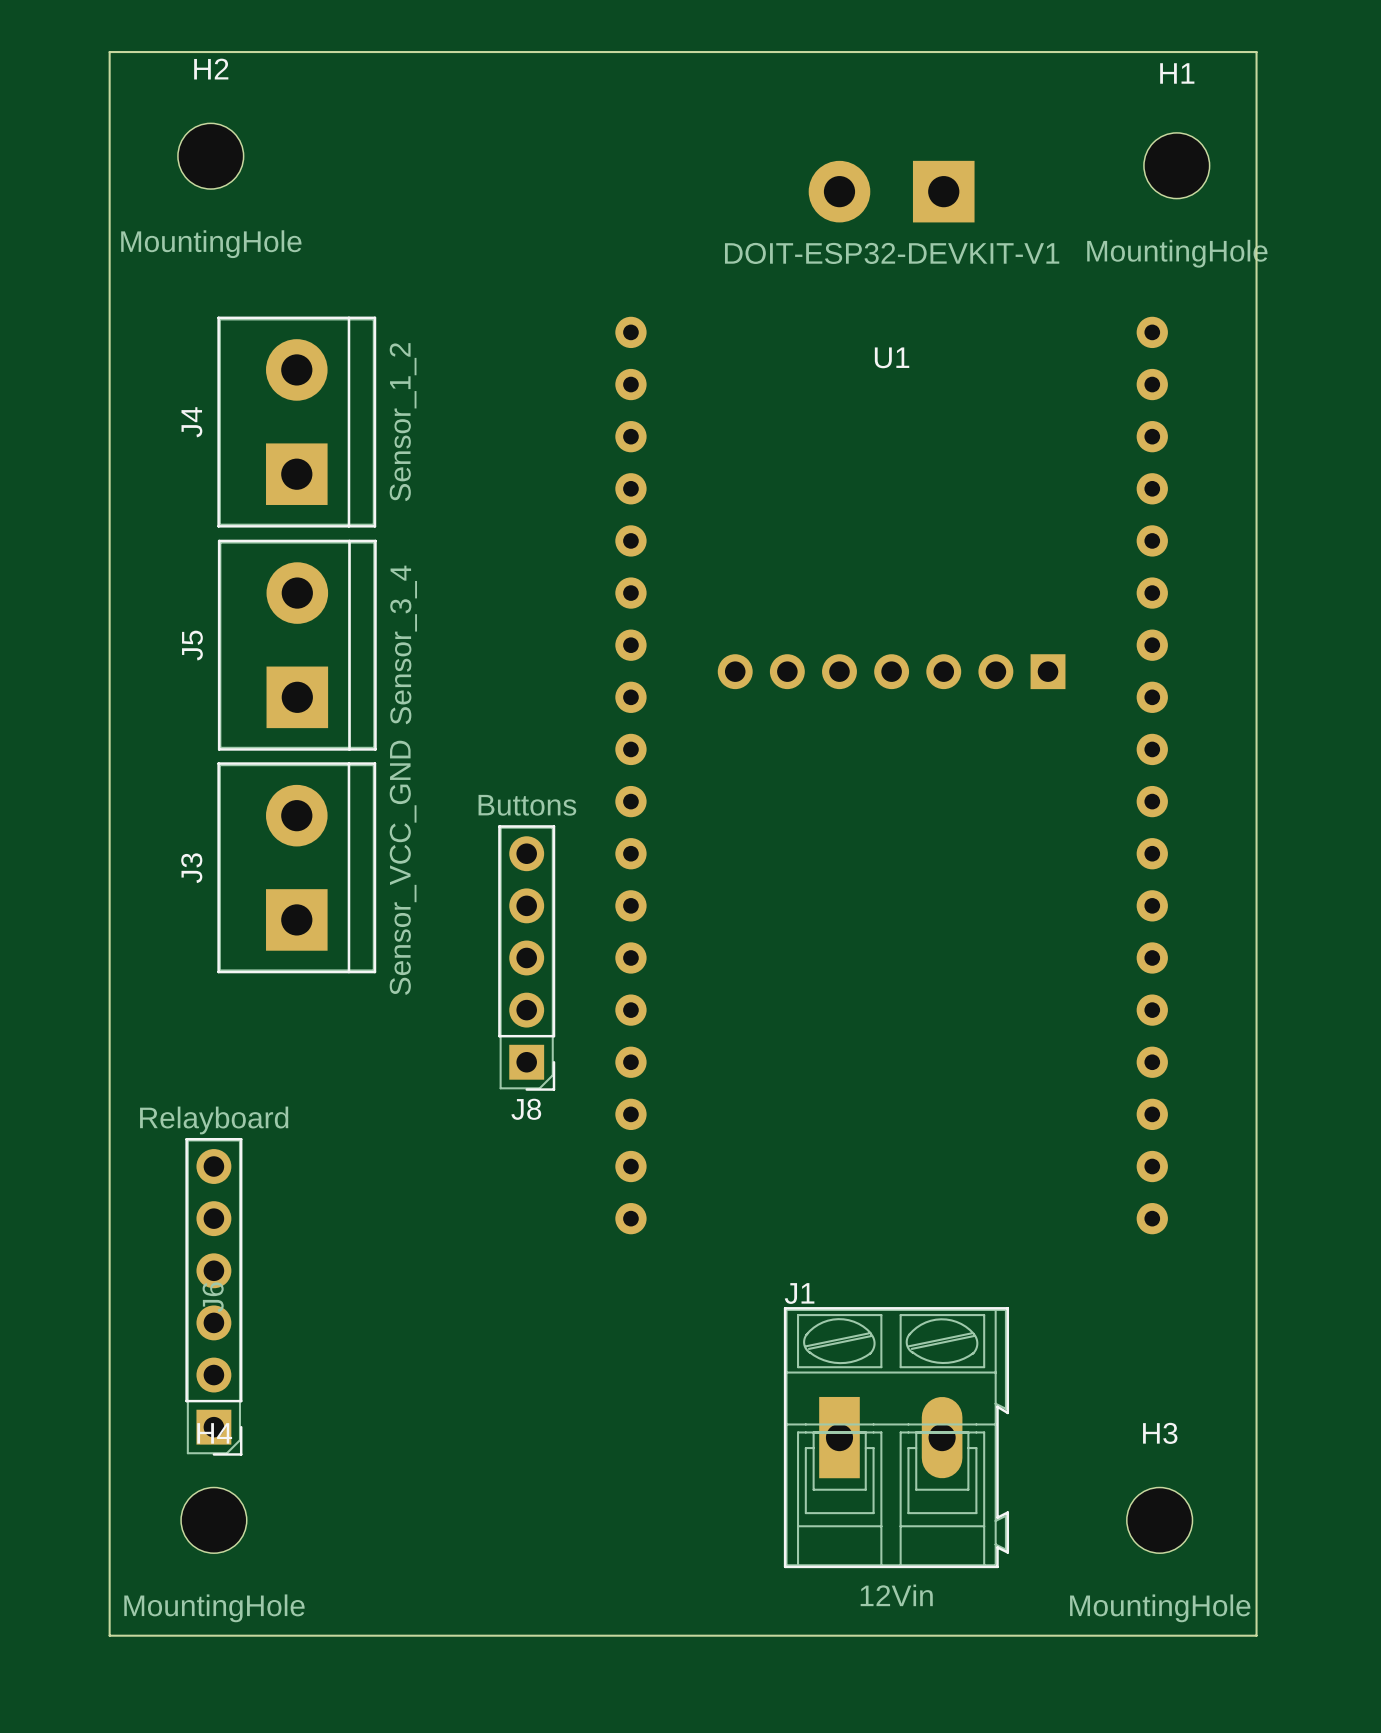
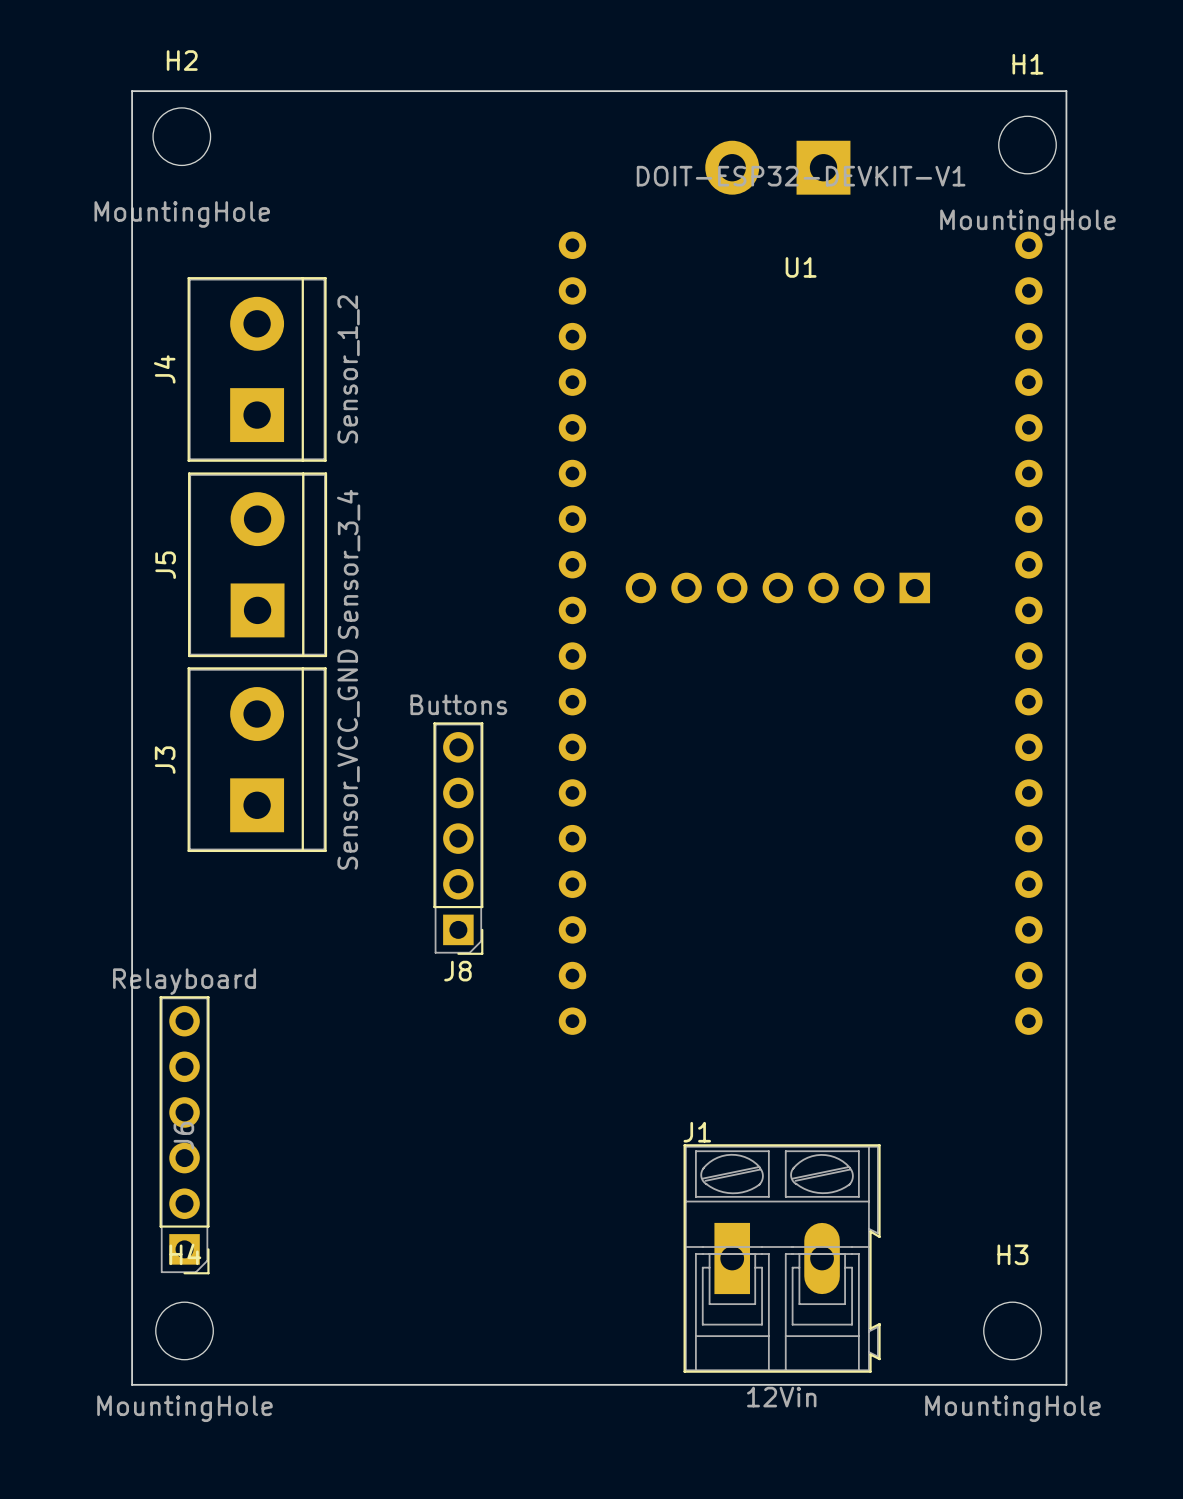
board edge: (109, 52) (1256, 52) (1256, 1635) (109, 1635) (109, 52) -> (132, 91) (132, 1384) (1066, 1384) (1066, 91) (132, 91)
U1 position: (891, 775) -> (800, 633)

